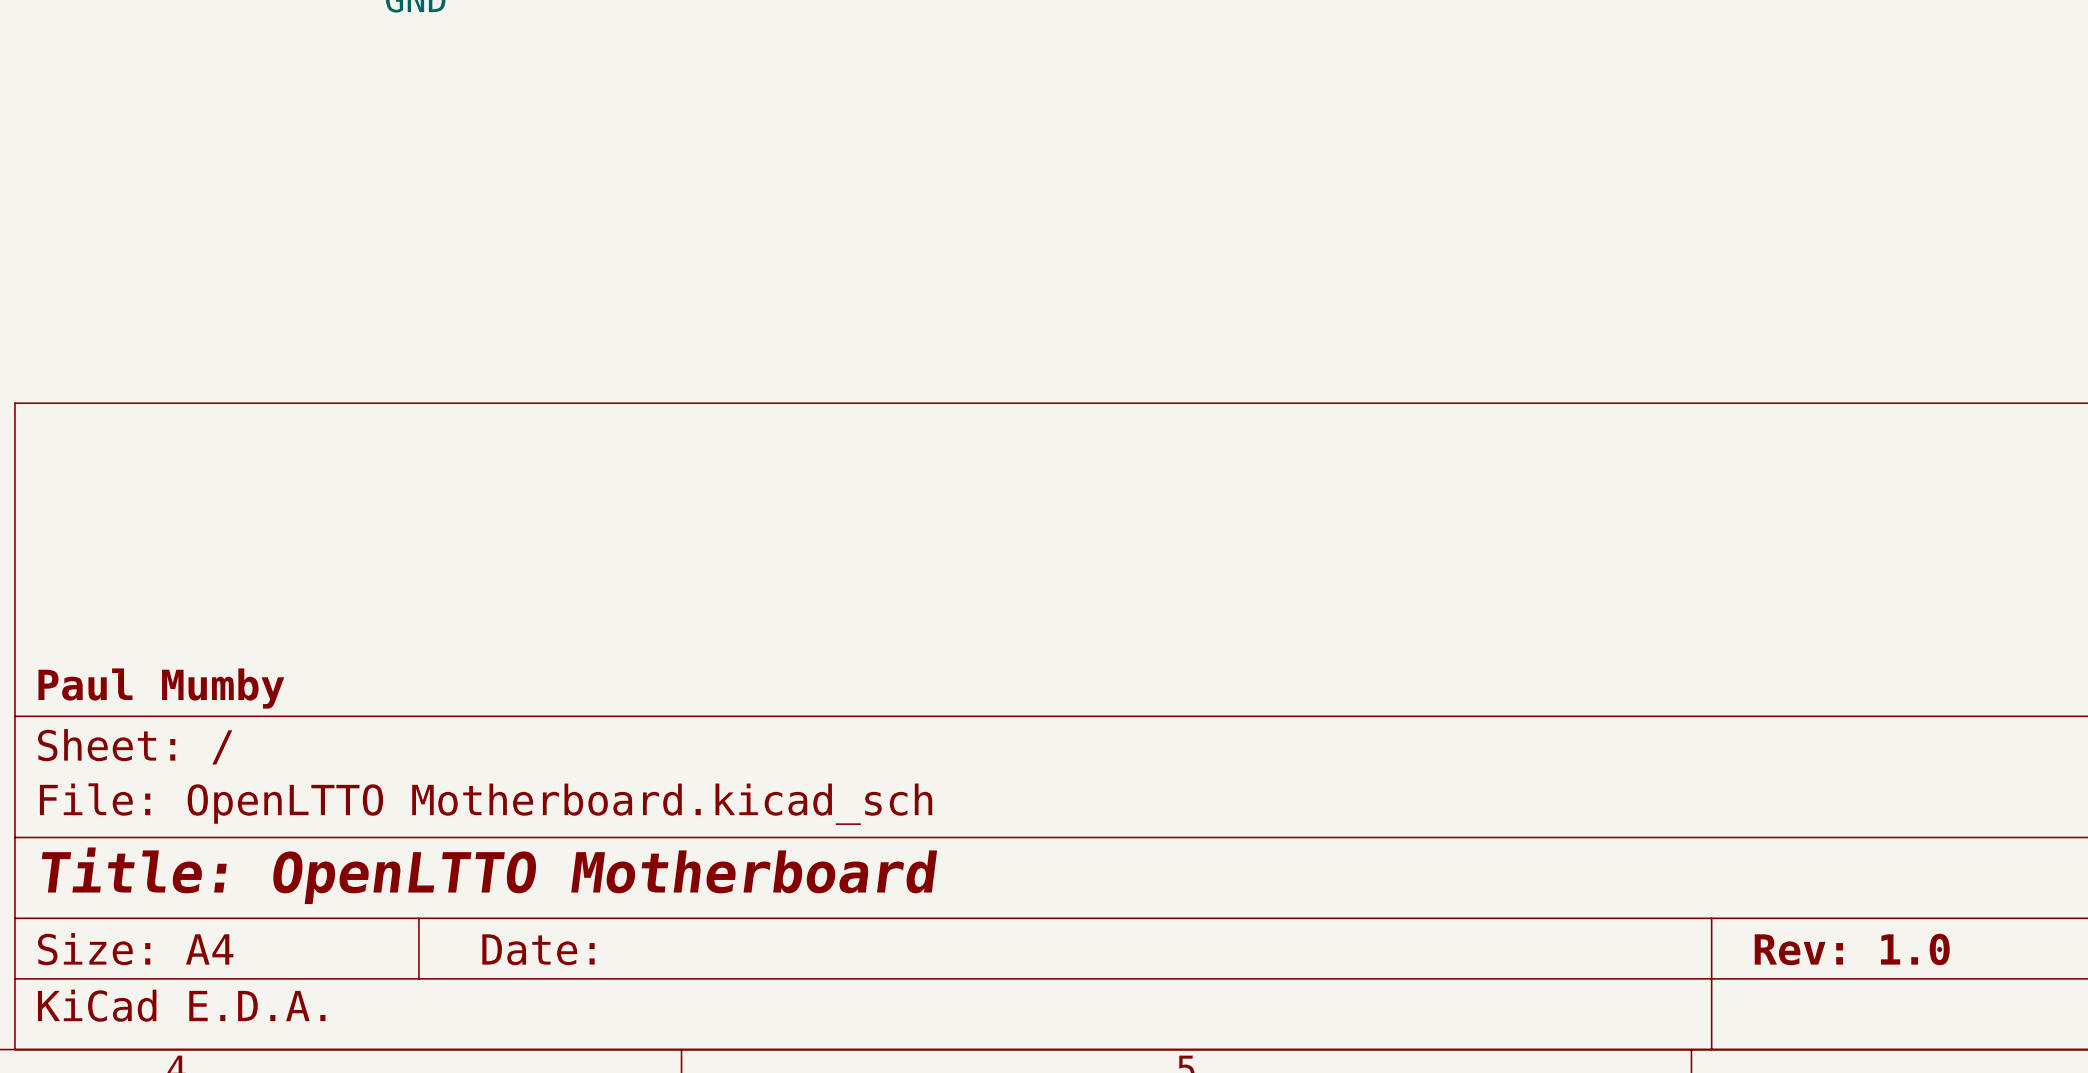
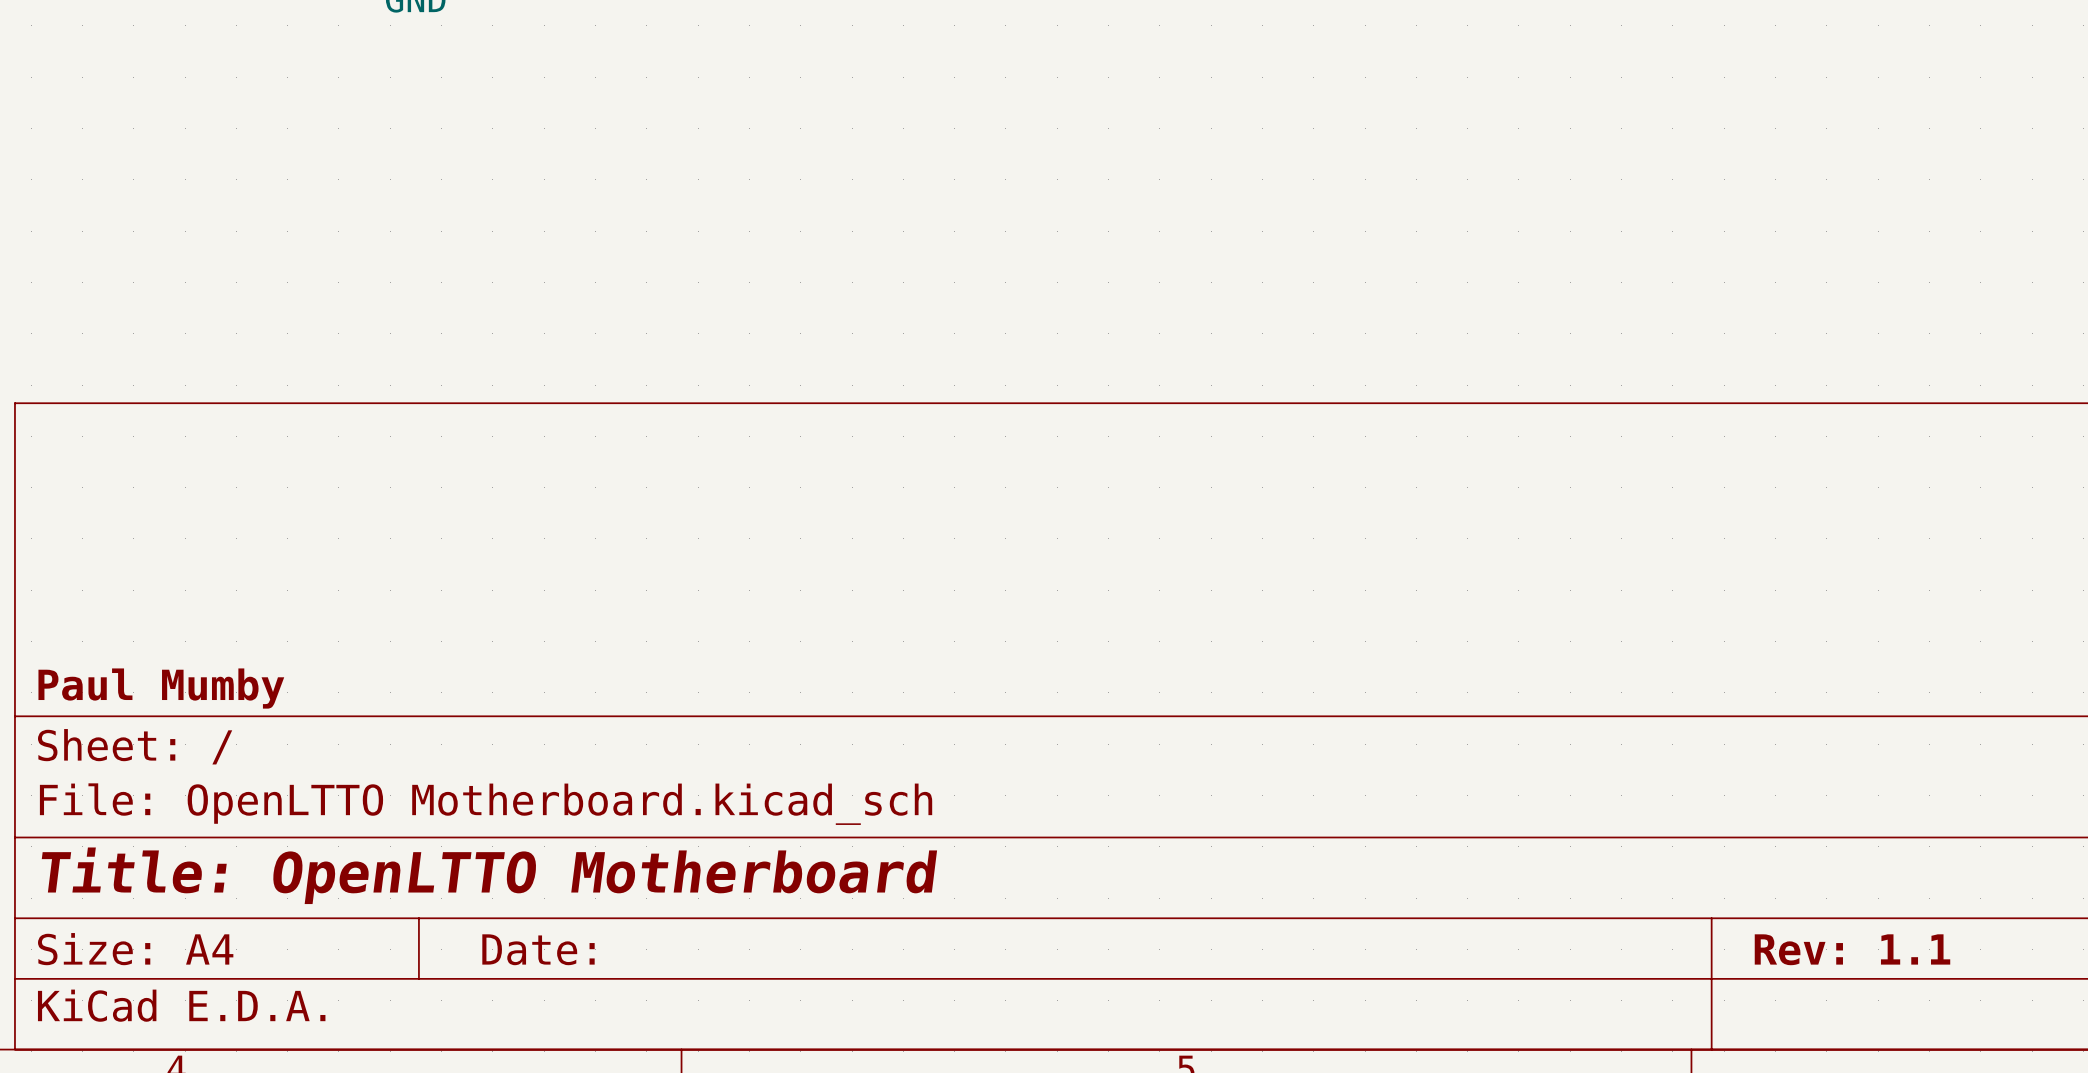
title block: Rev: 1.0 (1852, 949) -> Rev: 1.1 (1852, 949)

